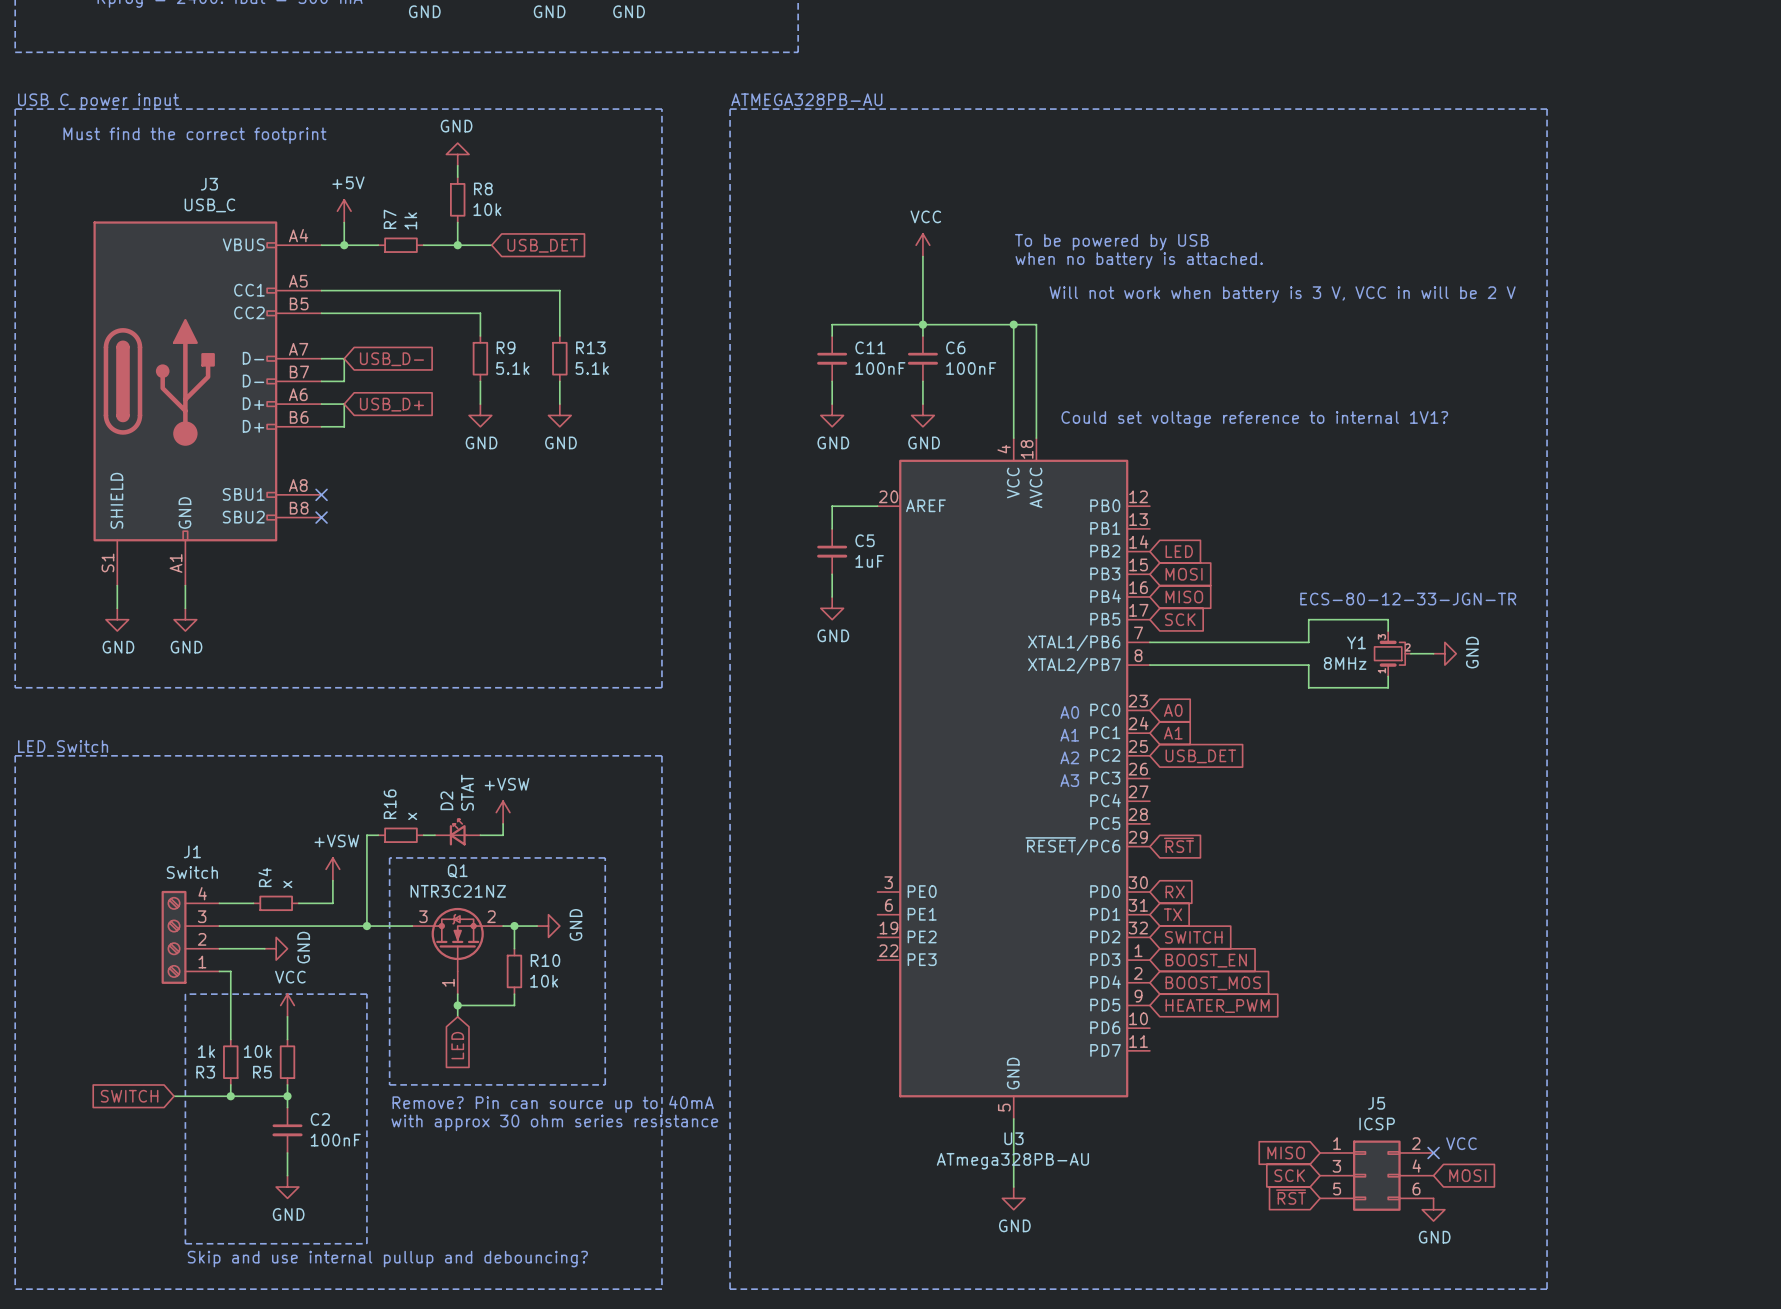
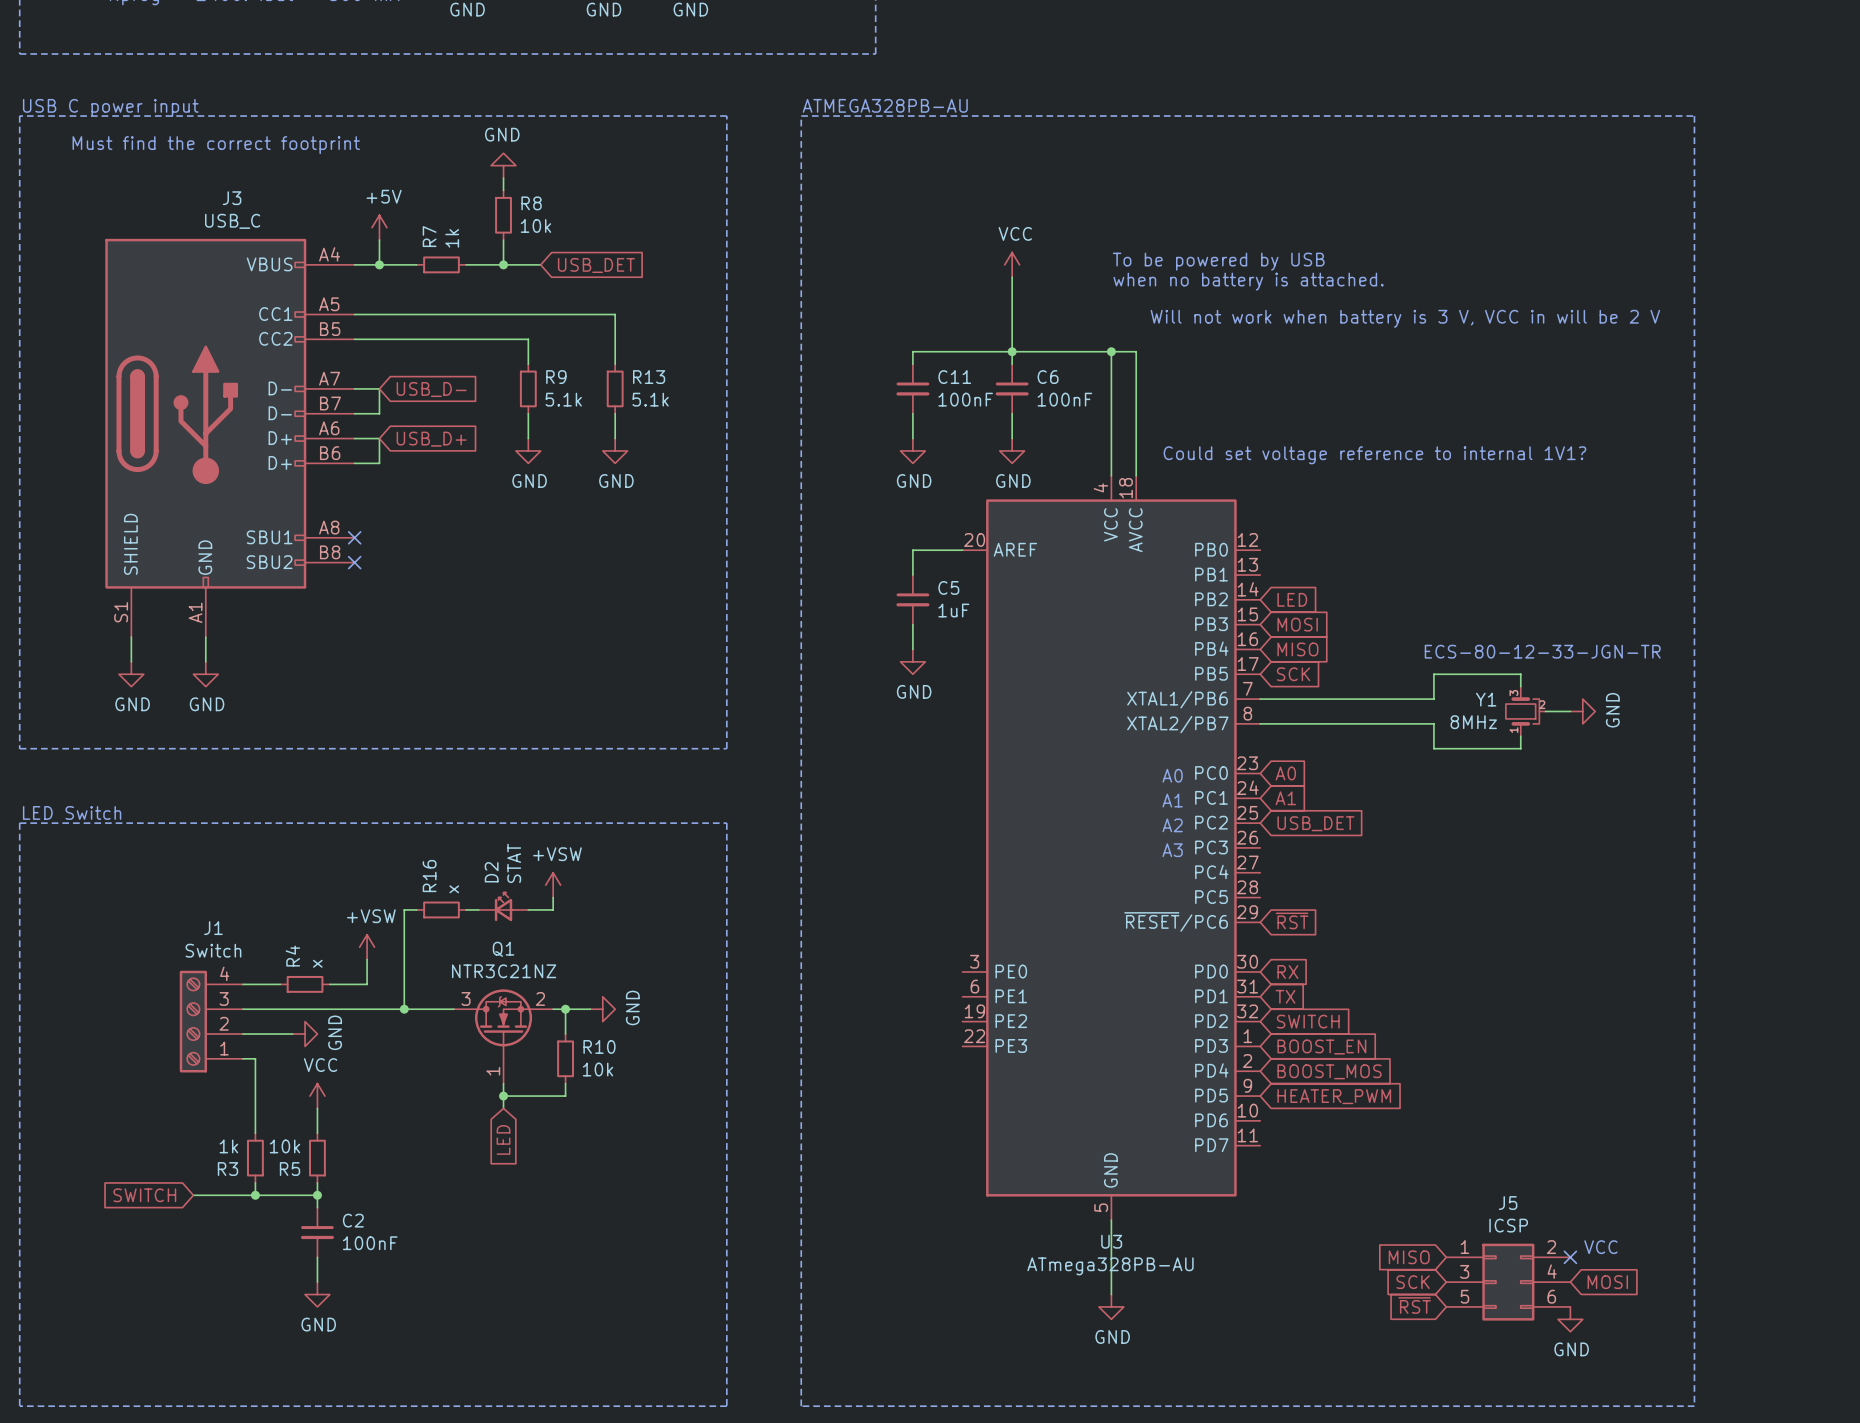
line: (389, 857) (605, 857) (605, 1084) (389, 1084) (389, 857) -> none
line: (185, 994) (366, 994) (366, 1243) (185, 1243) (185, 994) -> none
text: Remove? Pin can source up to 40mA (553, 1104) -> none
text: with approx 30 ohm series resistance (554, 1122) -> none
text: Skip and use internal pullup and debouncing? (387, 1259) -> none

